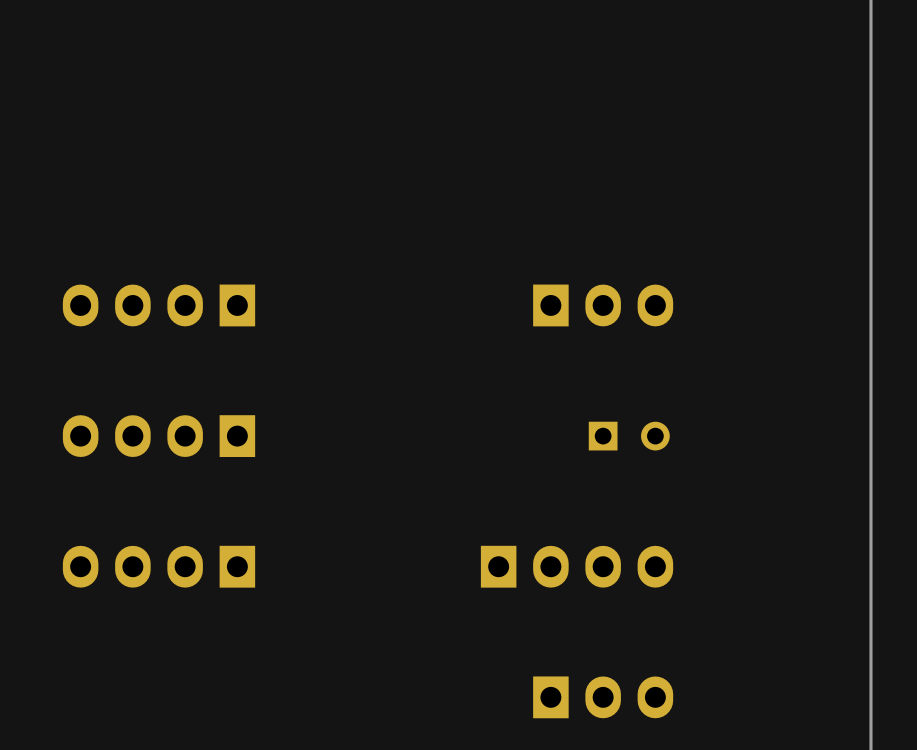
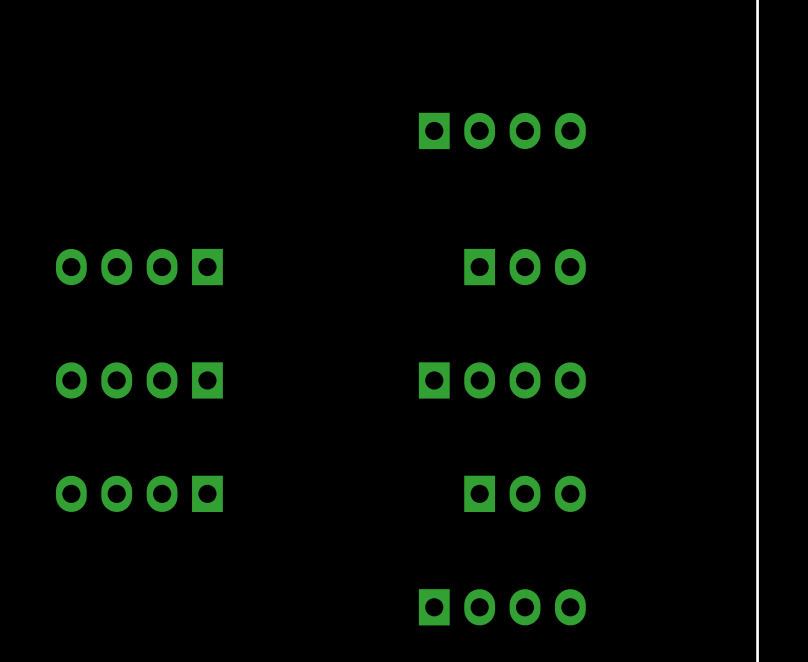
part: none -> (502, 130)
part: none -> (502, 380)
part: (629, 436) -> none
part: (577, 566) -> none
part: none -> (502, 607)
part position: (603, 697) -> (525, 493)

